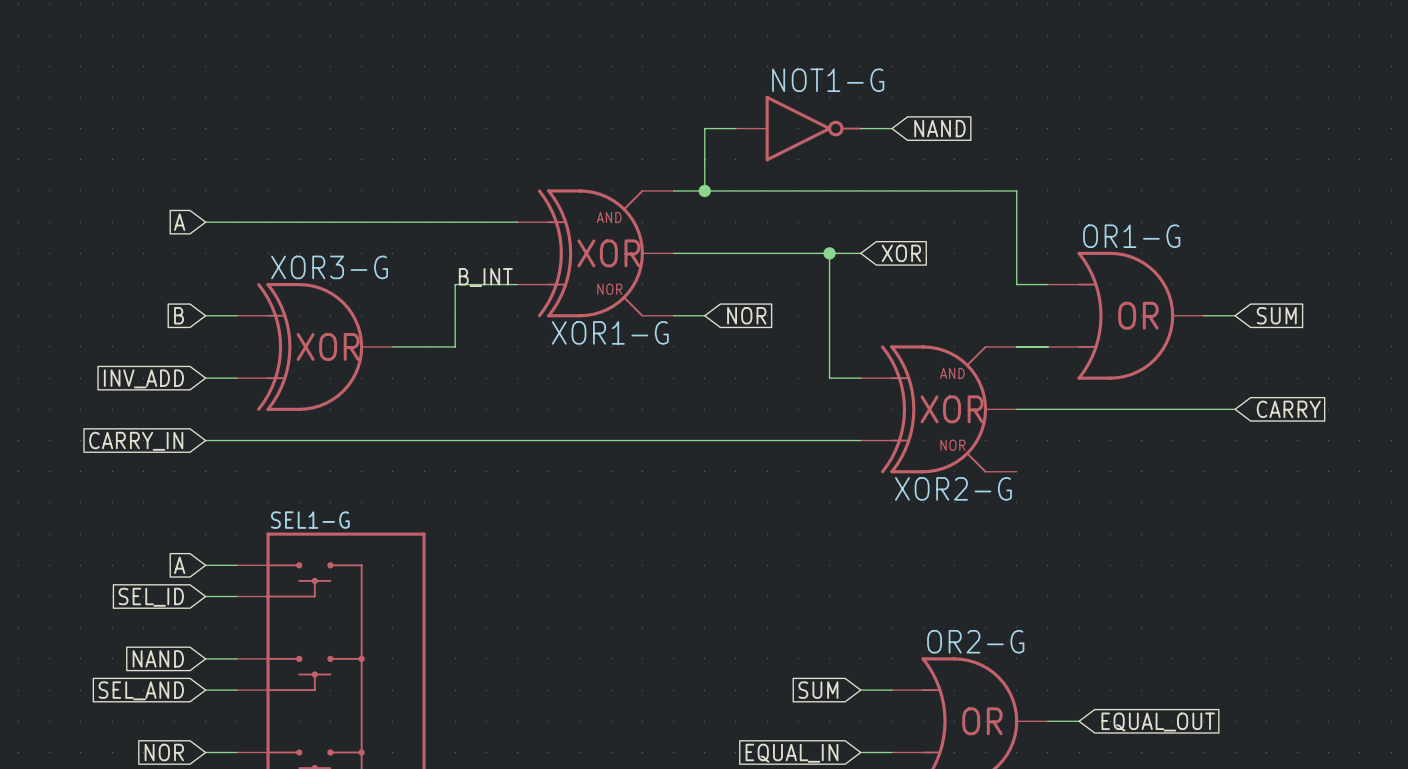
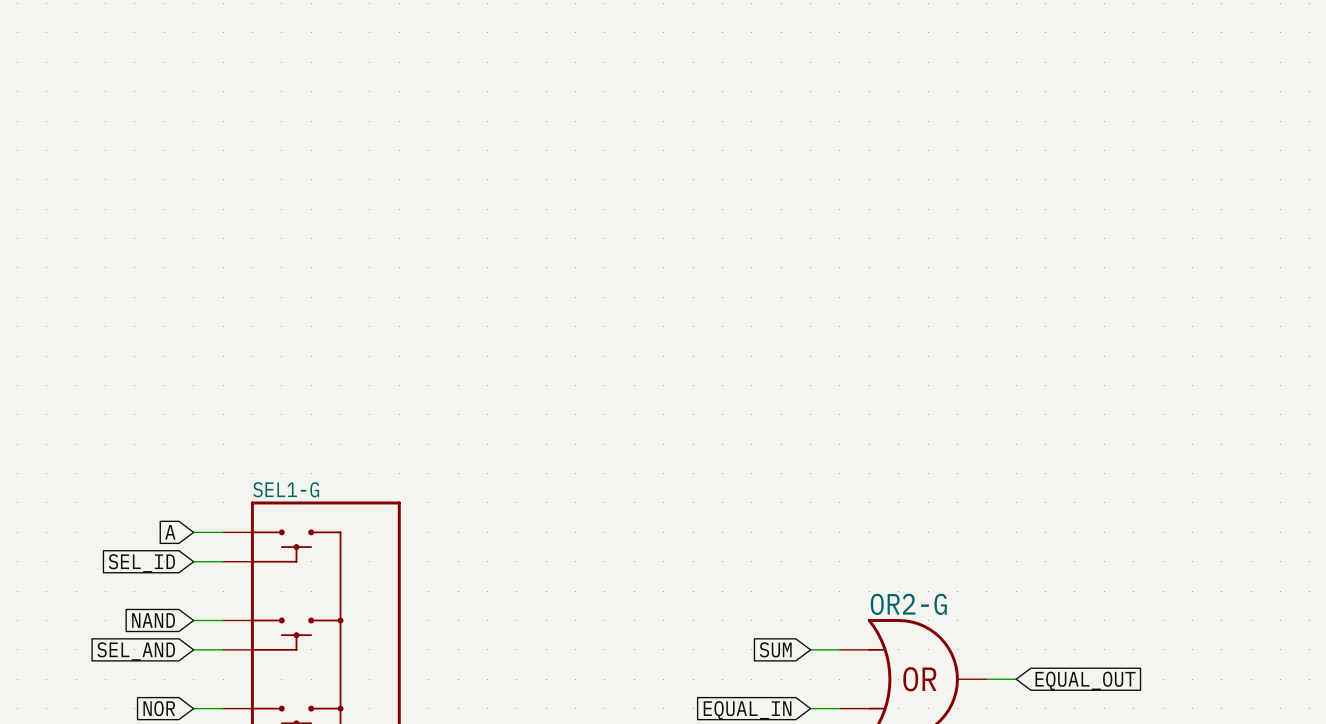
wire: (735, 128) (704, 128) (704, 190) -> none
NOT1-G: (798, 128) -> none
wire: (860, 128) (891, 128) -> none
global label: NAND (939, 128) -> none
wire: (673, 190) (1016, 190) (1016, 284) (1047, 284) -> none
junction: (704, 190) -> none
global label: A (179, 222) -> none
wire: (205, 222) (517, 222) -> none
XOR1-G: (595, 253) -> none
wire: (673, 253) (860, 253) -> none
wire: (829, 253) (829, 378) (860, 378) -> none
junction: (829, 253) -> none
global label: XOR (901, 253) -> none
label: B_INT (485, 277) -> none
wire: (517, 284) (455, 284) (455, 346) (392, 346) -> none
global label: B (179, 315) -> none
wire: (205, 315) (236, 315) -> none
wire: (673, 315) (704, 315) -> none
global label: NOR (746, 315) -> none
OR1-G: (1125, 315) -> none
wire: (1203, 315) (1235, 315) -> none
global label: SUM (1276, 315) -> none
XOR3-G: (314, 346) -> none
wire: (1016, 346) (1047, 346) -> none
global label: INV_ADD (143, 378) -> none
wire: (205, 378) (236, 378) -> none
XOR2-G: (938, 409) -> none
wire: (1016, 409) (1235, 409) -> none
global label: CARRY (1288, 409) -> none
wire: (205, 440) (860, 440) -> none
global label: CARRY_IN (136, 441) -> none

